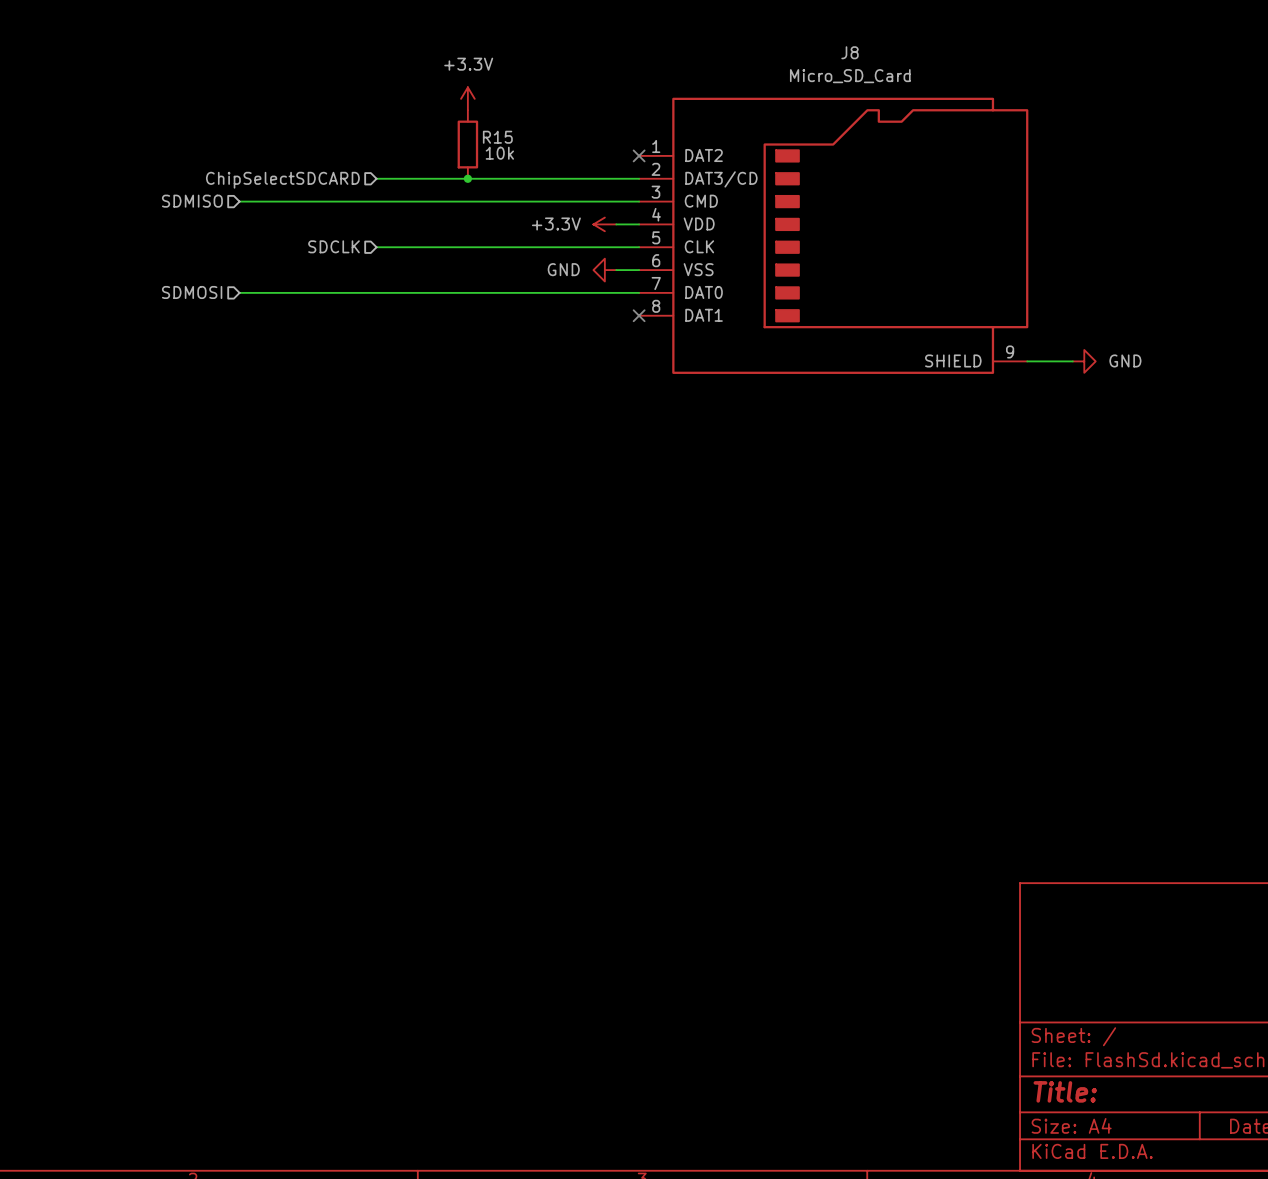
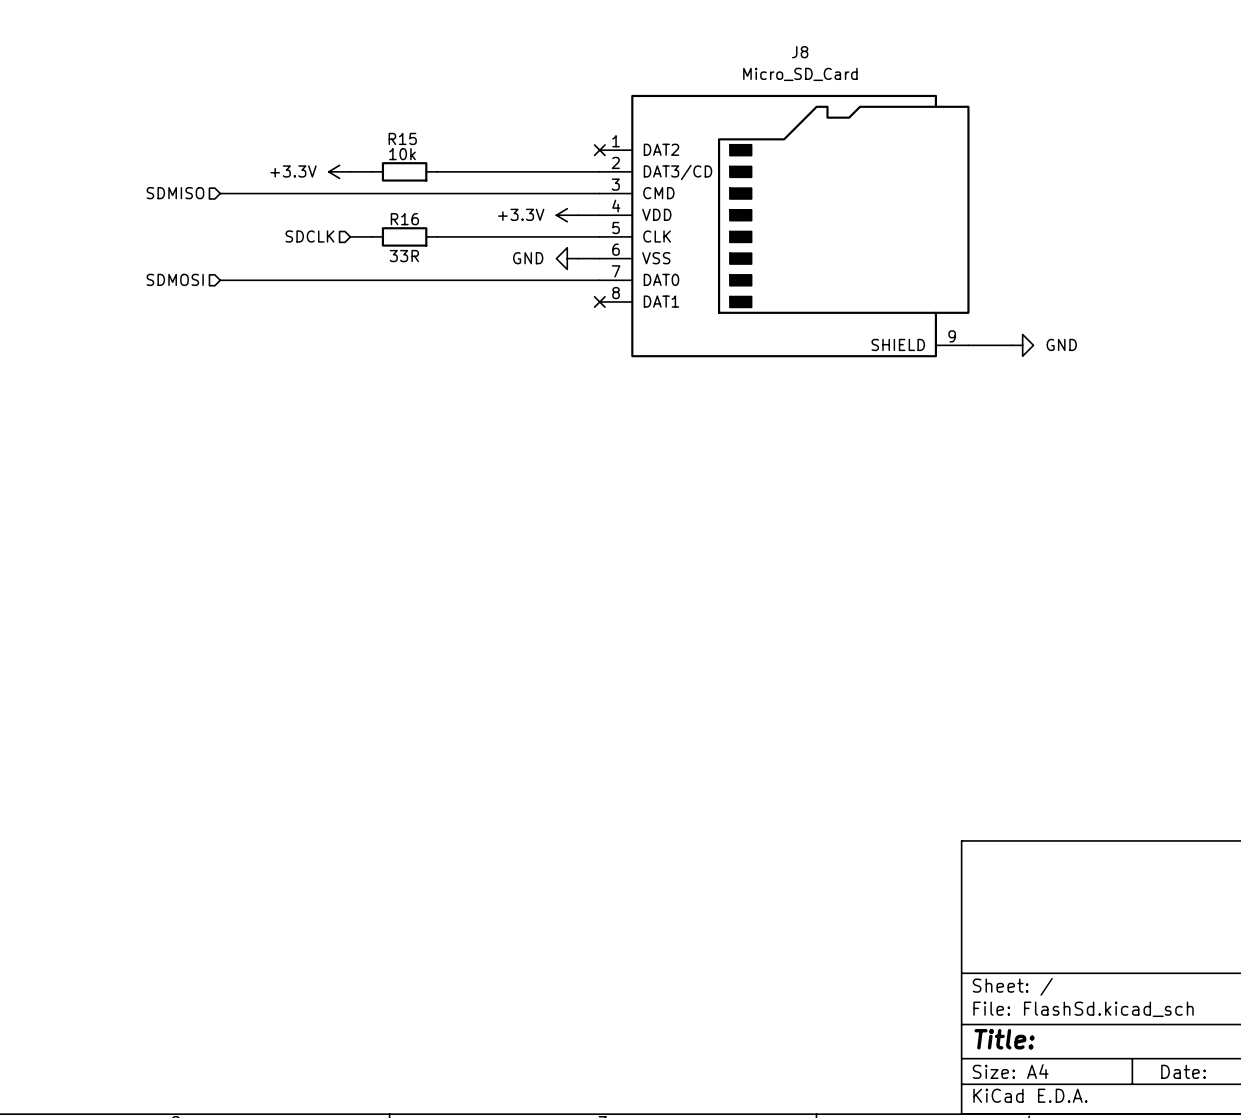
power symbol text position: +3.3V (468, 64) -> +3.3V (293, 171)
power symbol rotation: 0° (467, 98) -> 90° counterclockwise (339, 171)
power symbol position: +3.3V (467, 98) -> +3.3V (339, 171)
R15 name position: R15 (497, 137) -> R15 (402, 138)
R15 rotation: 0° (467, 144) -> 90° clockwise (404, 171)
R15 position: (467, 144) -> (404, 171)
R15 value position: 10k (499, 153) -> 10k (402, 154)
wire: (399, 178) (467, 178) -> none
junction: (467, 178) -> none
hierarchical label: ChipSelectSDCARD (282, 180) -> none
wire: (399, 247) (467, 247) -> none
R16: none -> 33R (404, 236)

